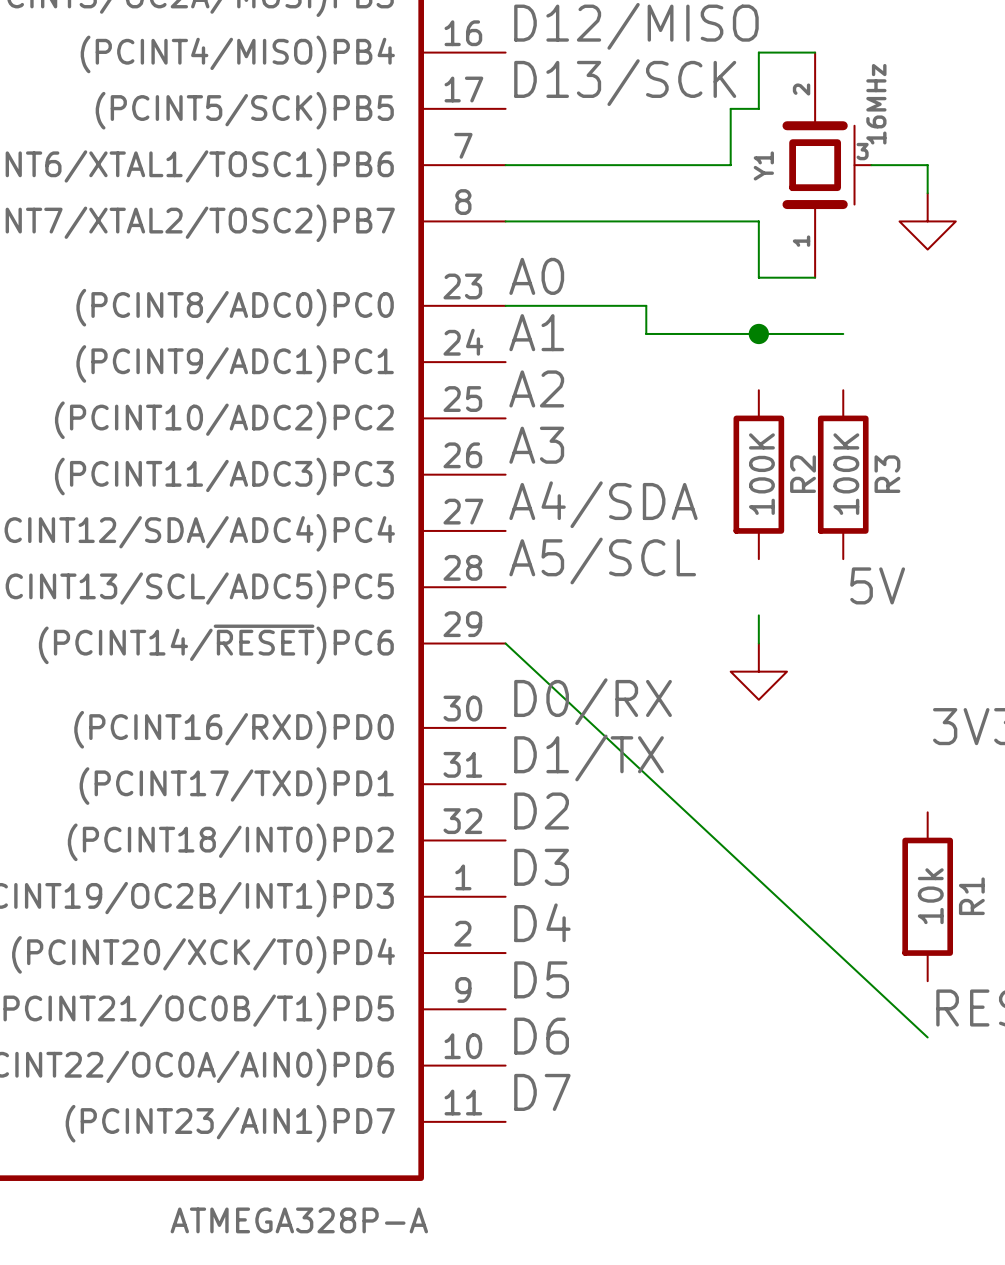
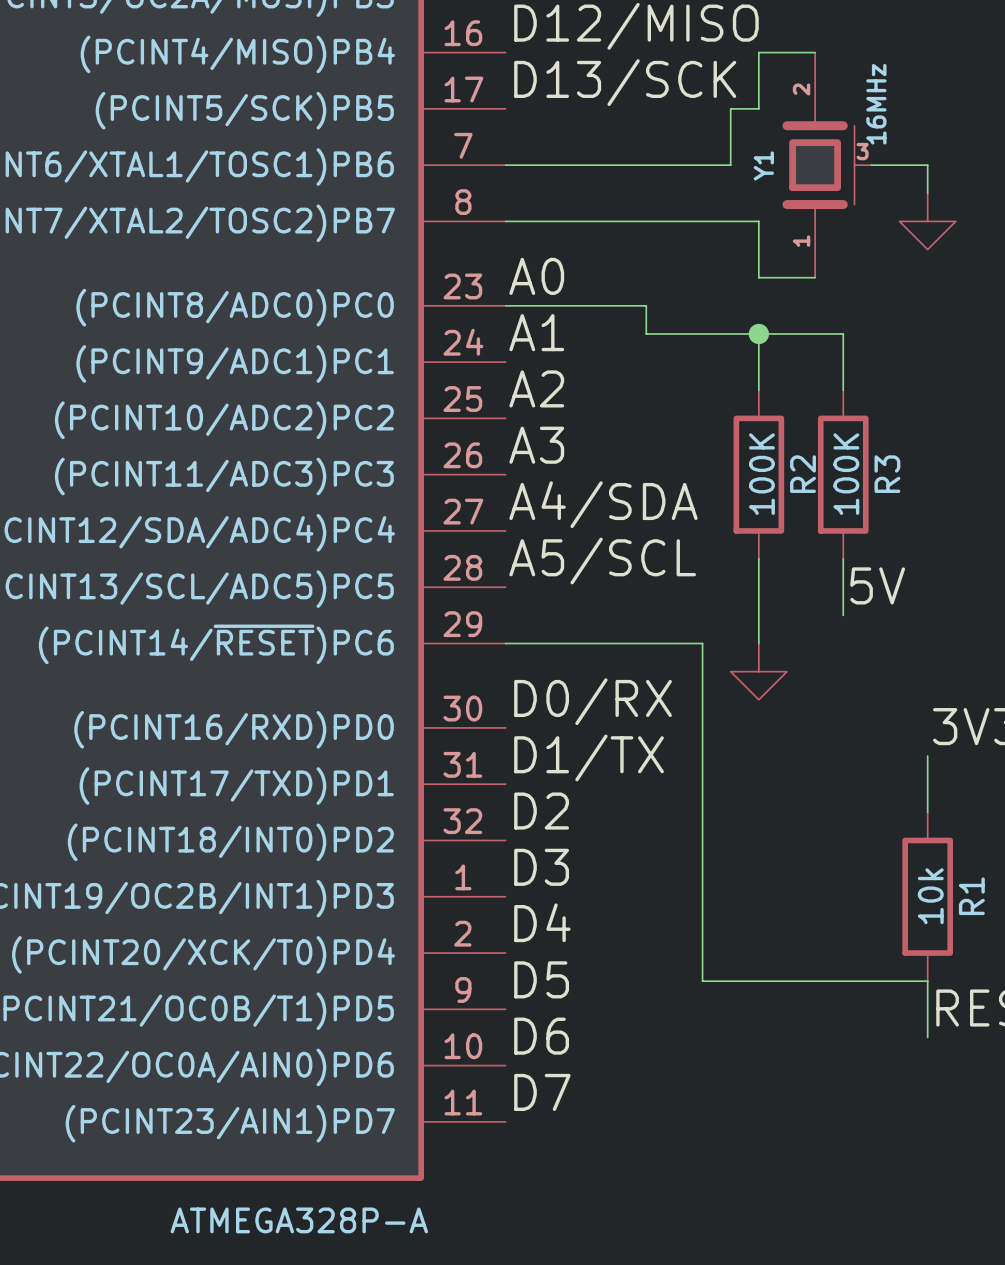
wire: none -> (758, 333) (758, 390)
wire: none -> (843, 333) (843, 390)
wire: none -> (758, 559) (758, 615)
wire: none -> (843, 559) (843, 615)
wire: (505, 643) (927, 1037) -> (505, 643) (702, 643) (702, 981) (927, 981) (927, 1037)
wire: none -> (927, 756) (927, 812)

